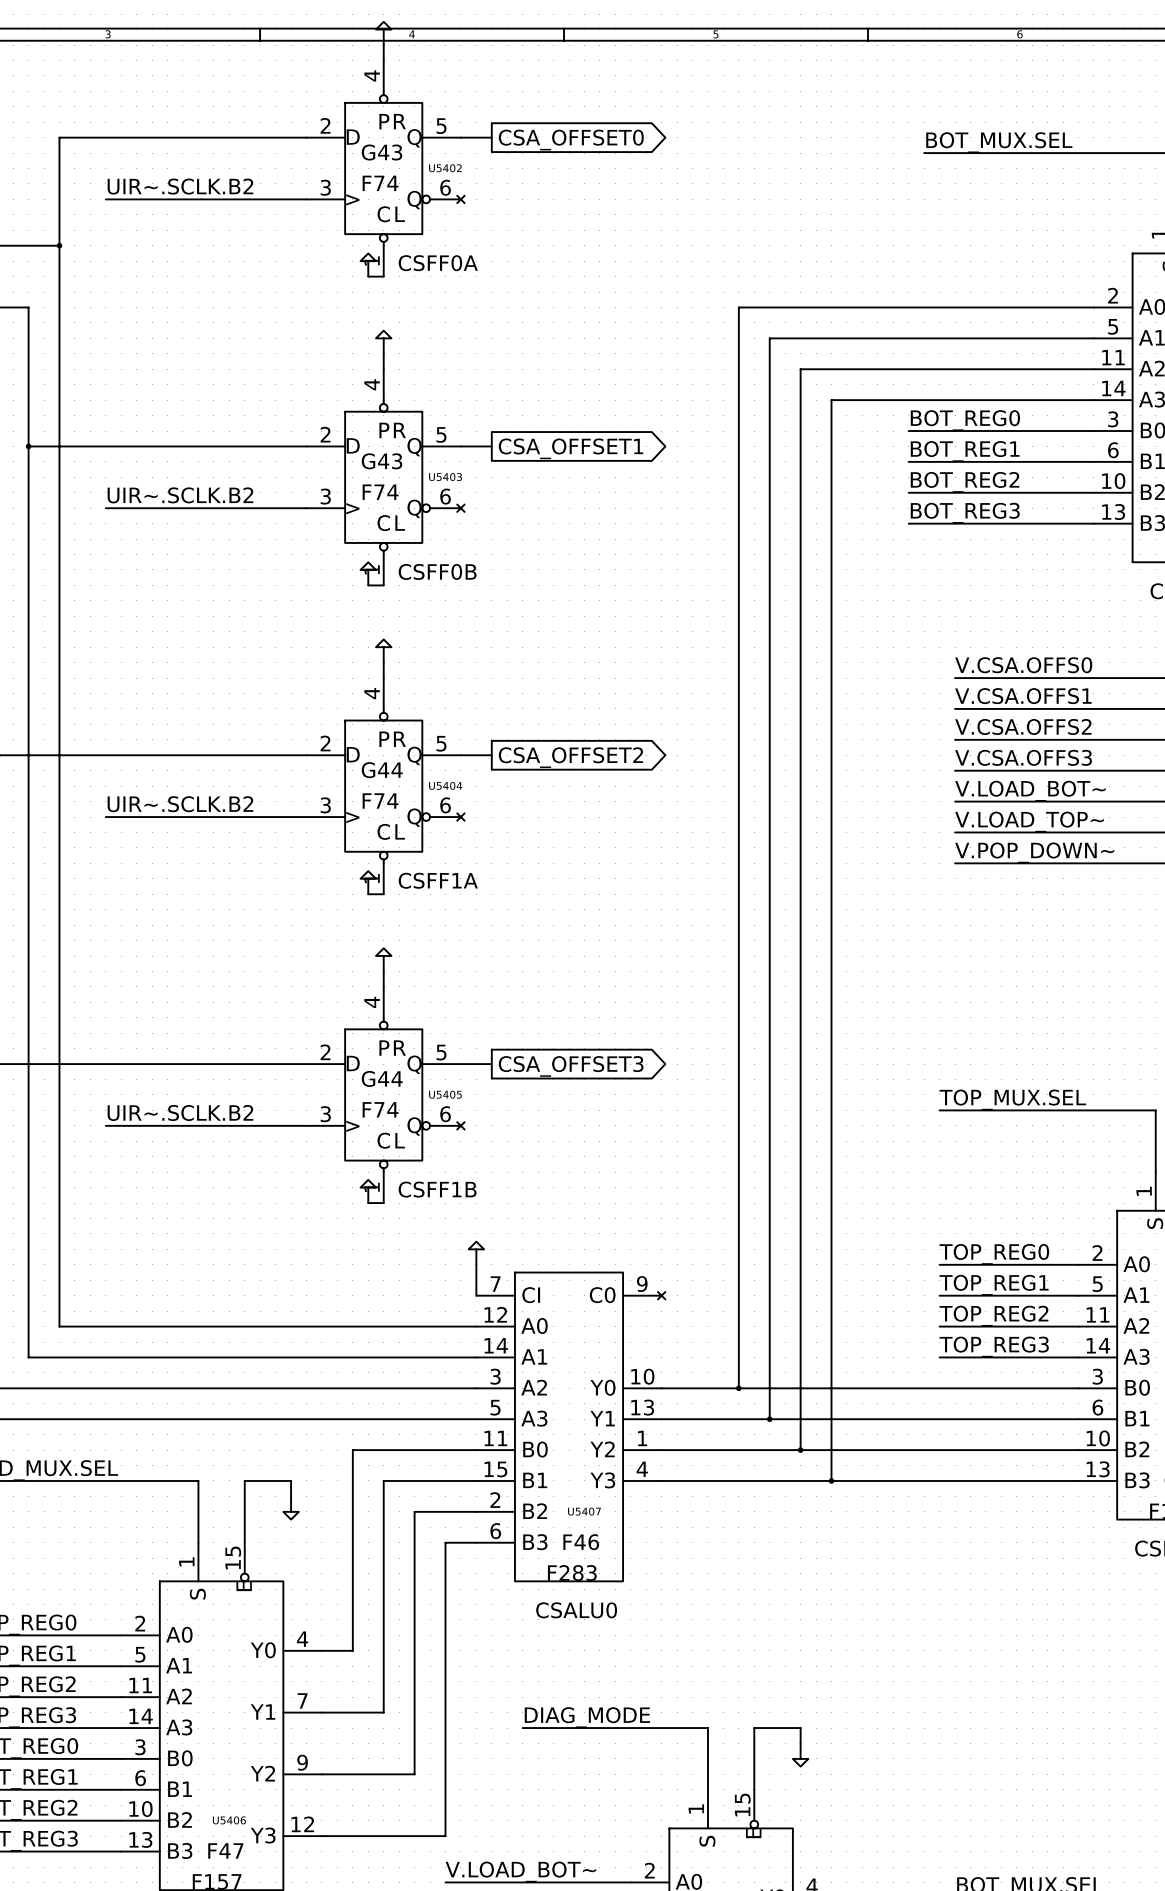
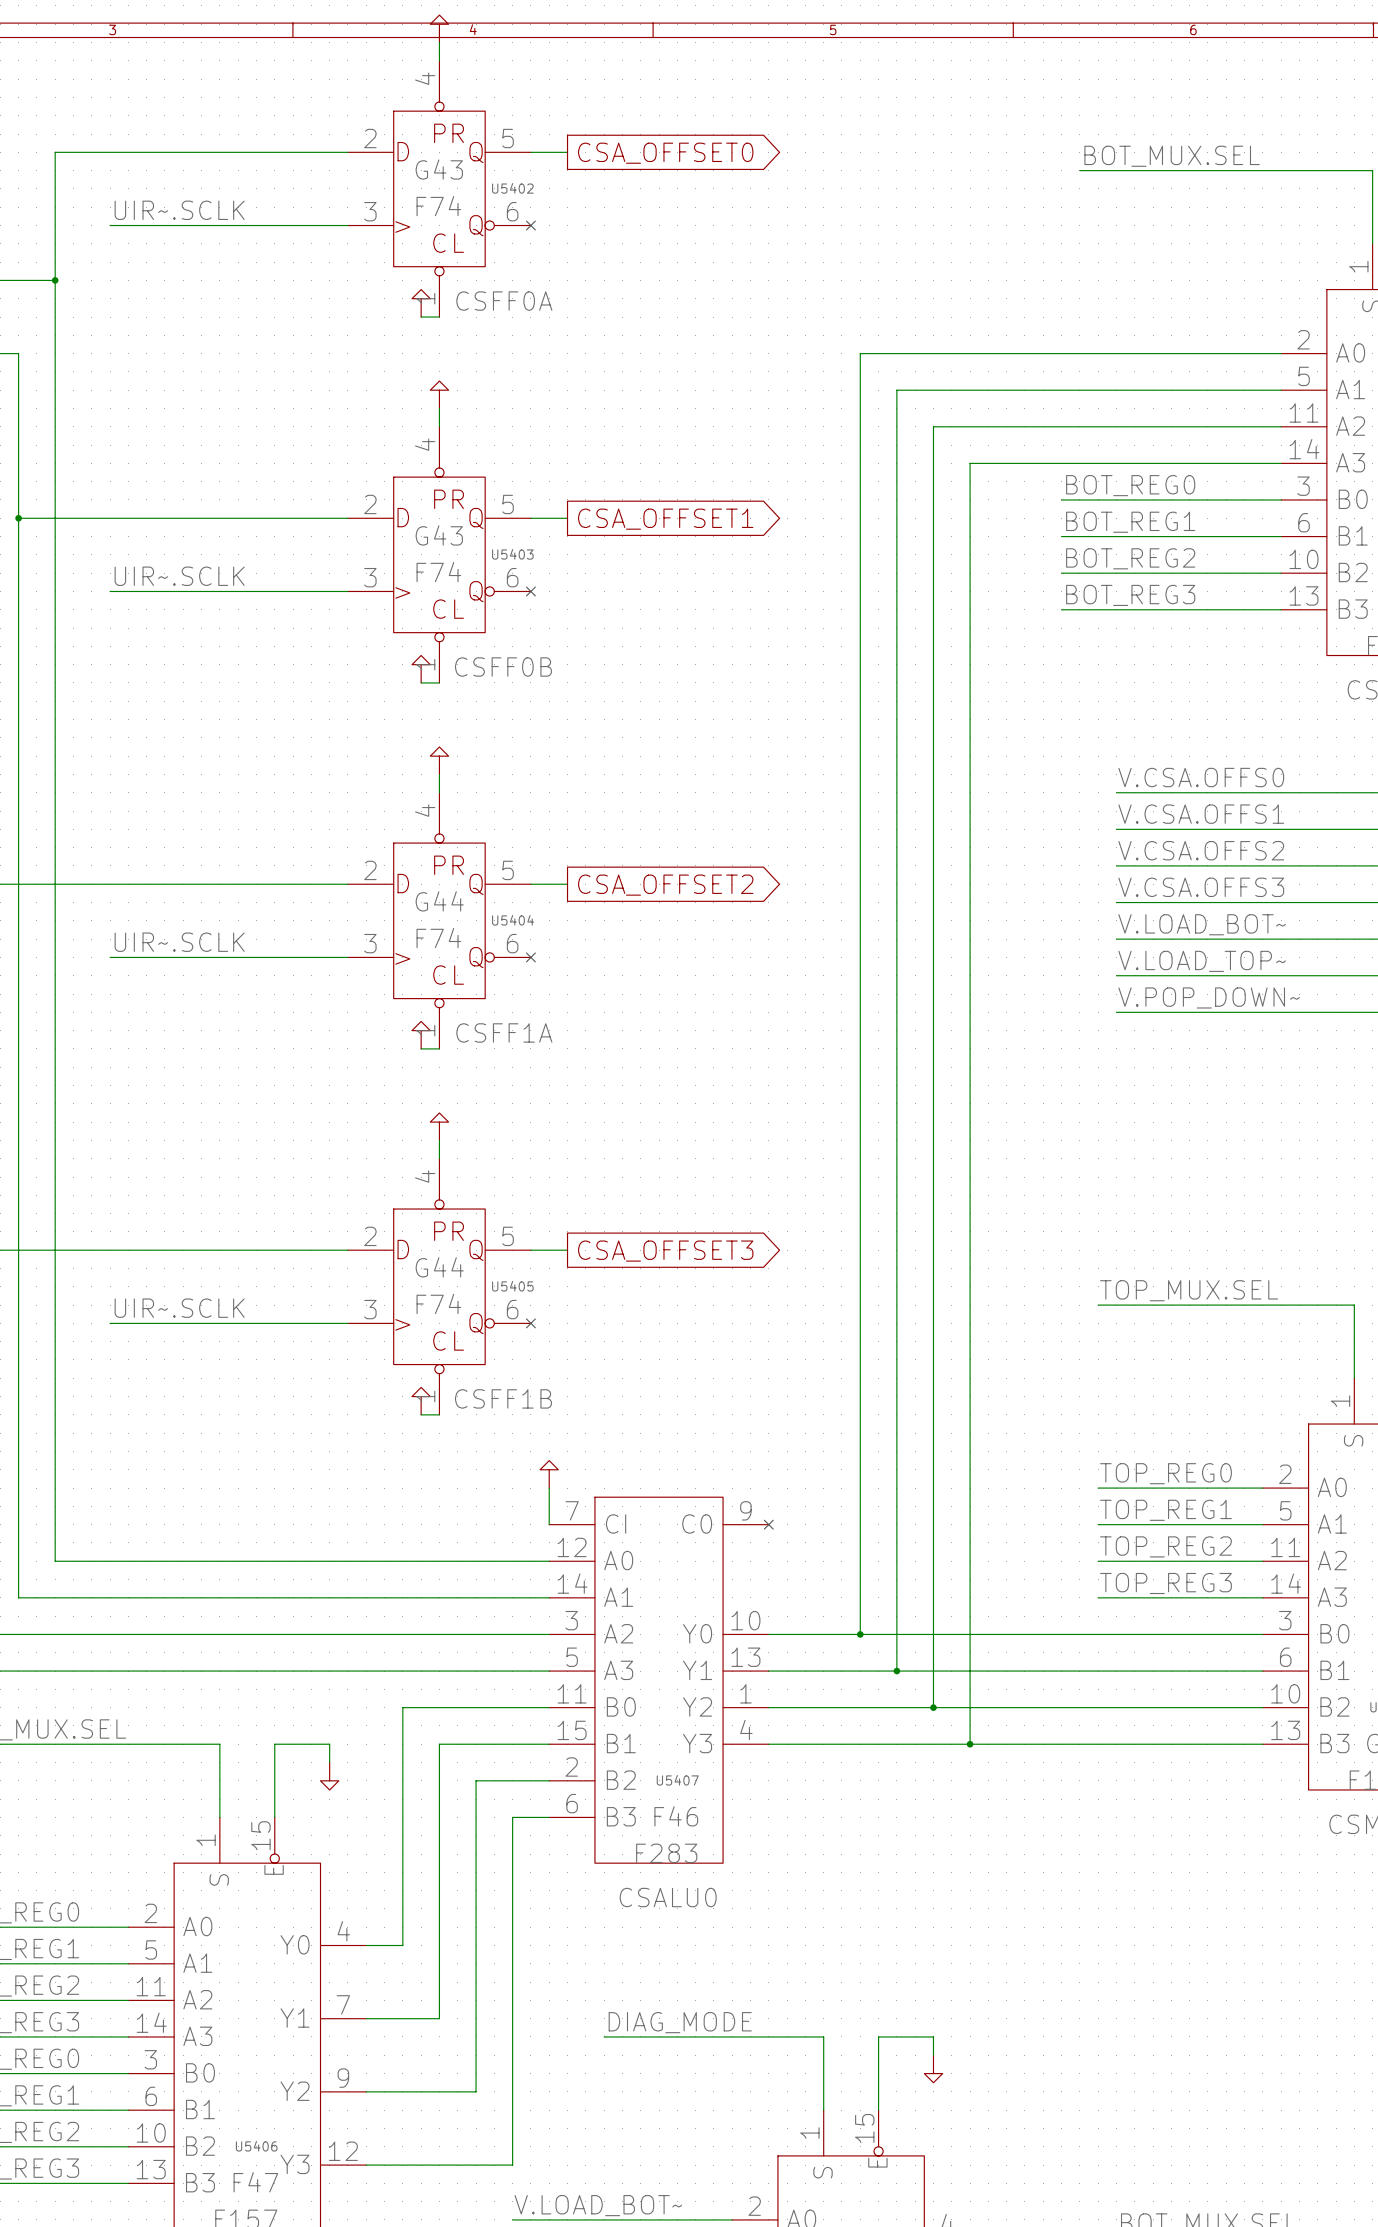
label: UIR~.SCLK.B2 (180, 186) -> UIR~.SCLK (179, 210)
label: UIR~.SCLK.B2 (180, 495) -> UIR~.SCLK (179, 576)
label: UIR~.SCLK.B2 (180, 804) -> UIR~.SCLK (179, 942)
label: UIR~.SCLK.B2 (180, 1113) -> UIR~.SCLK (179, 1308)

